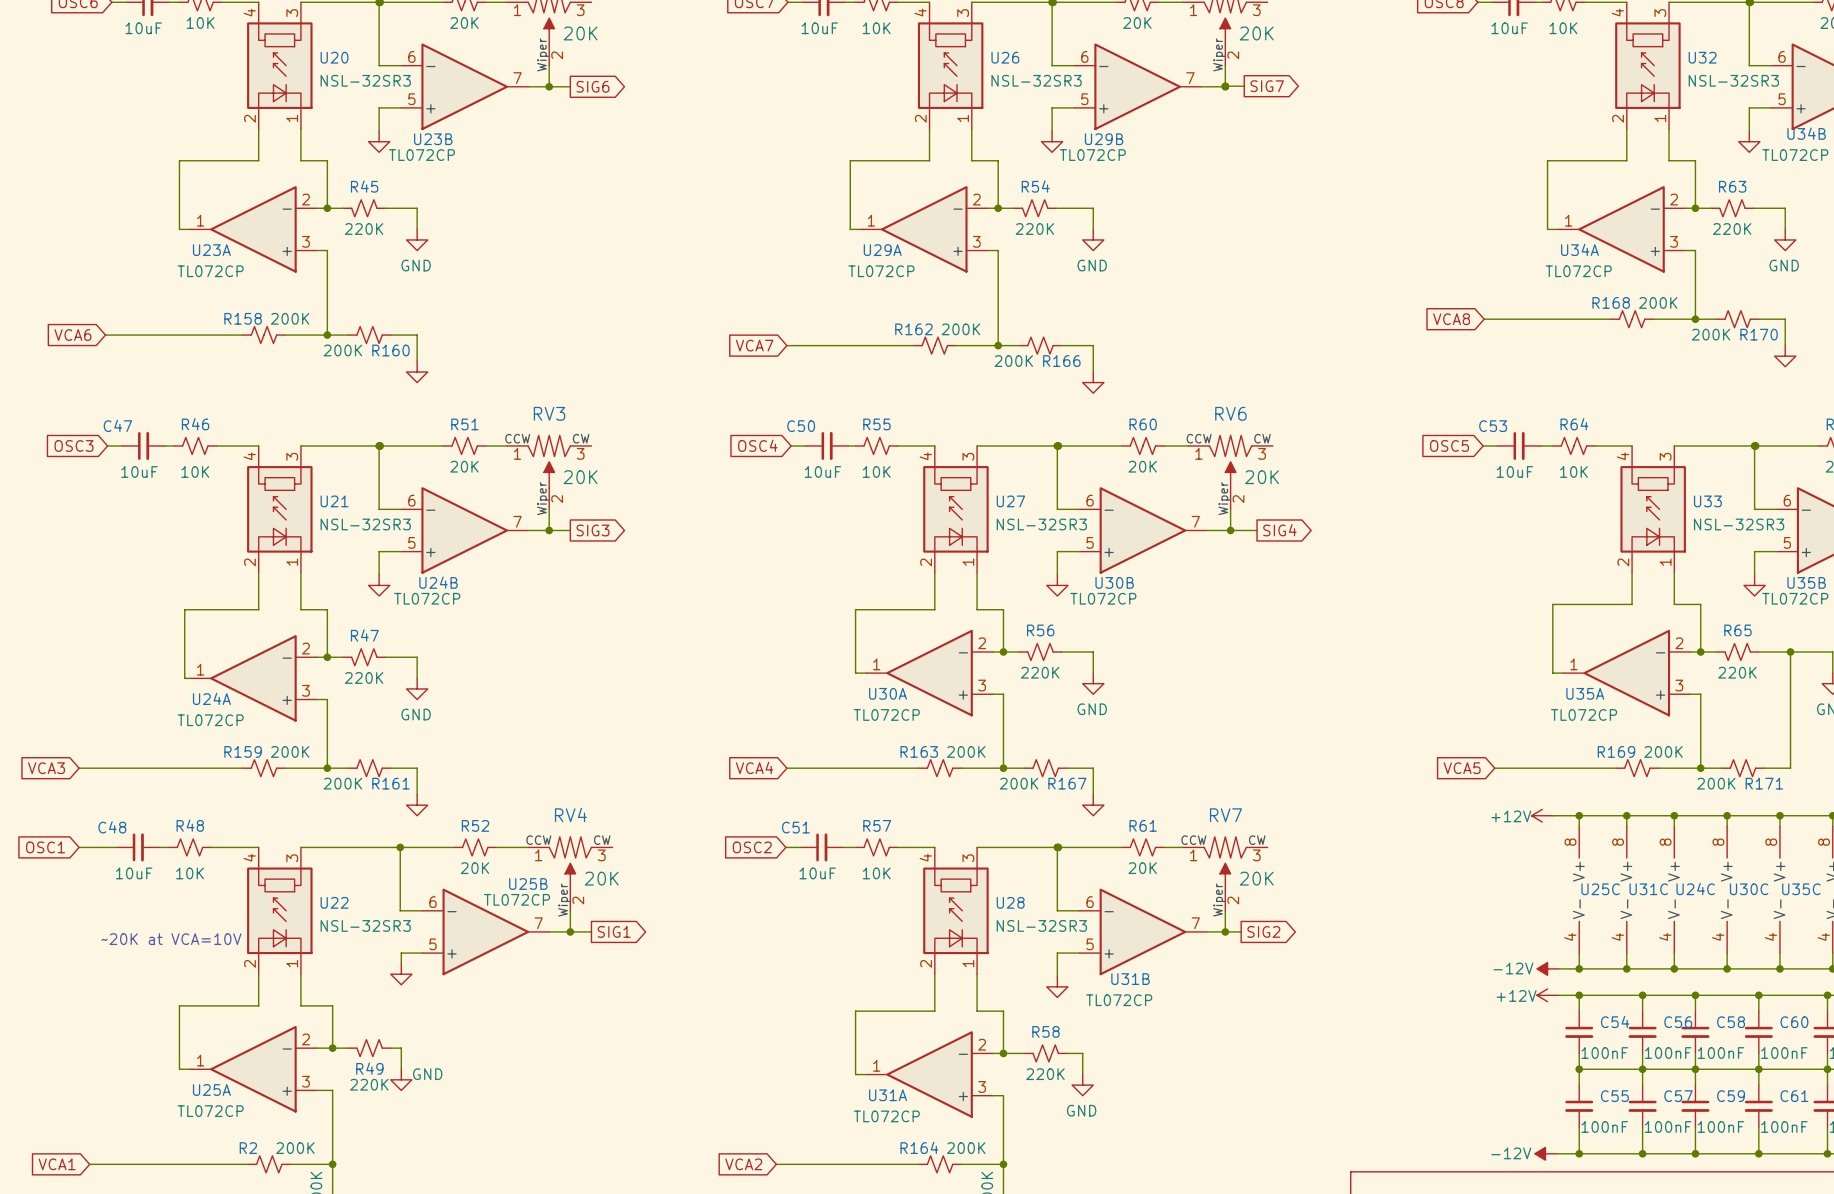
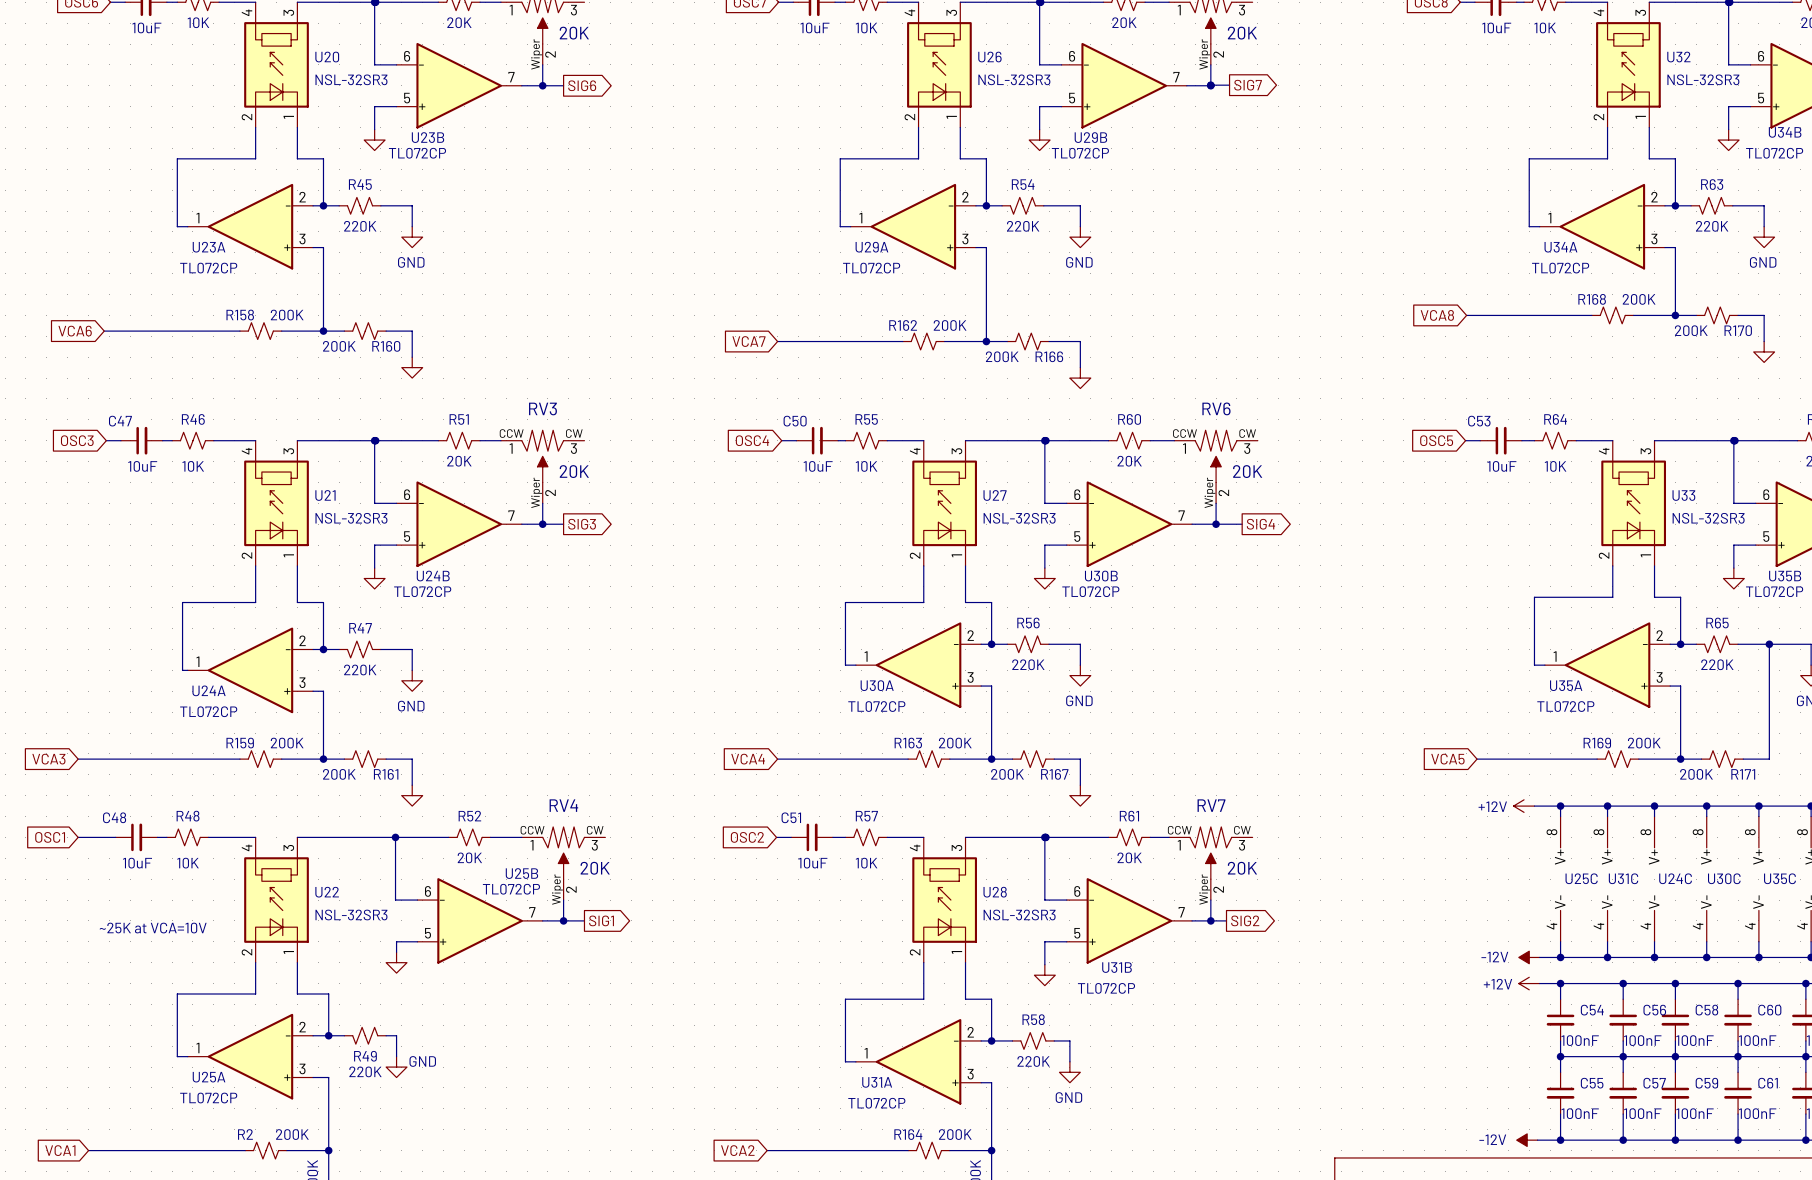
text: ~20K at VCA=10V (171, 939) -> ~25K at VCA=10V (153, 928)

